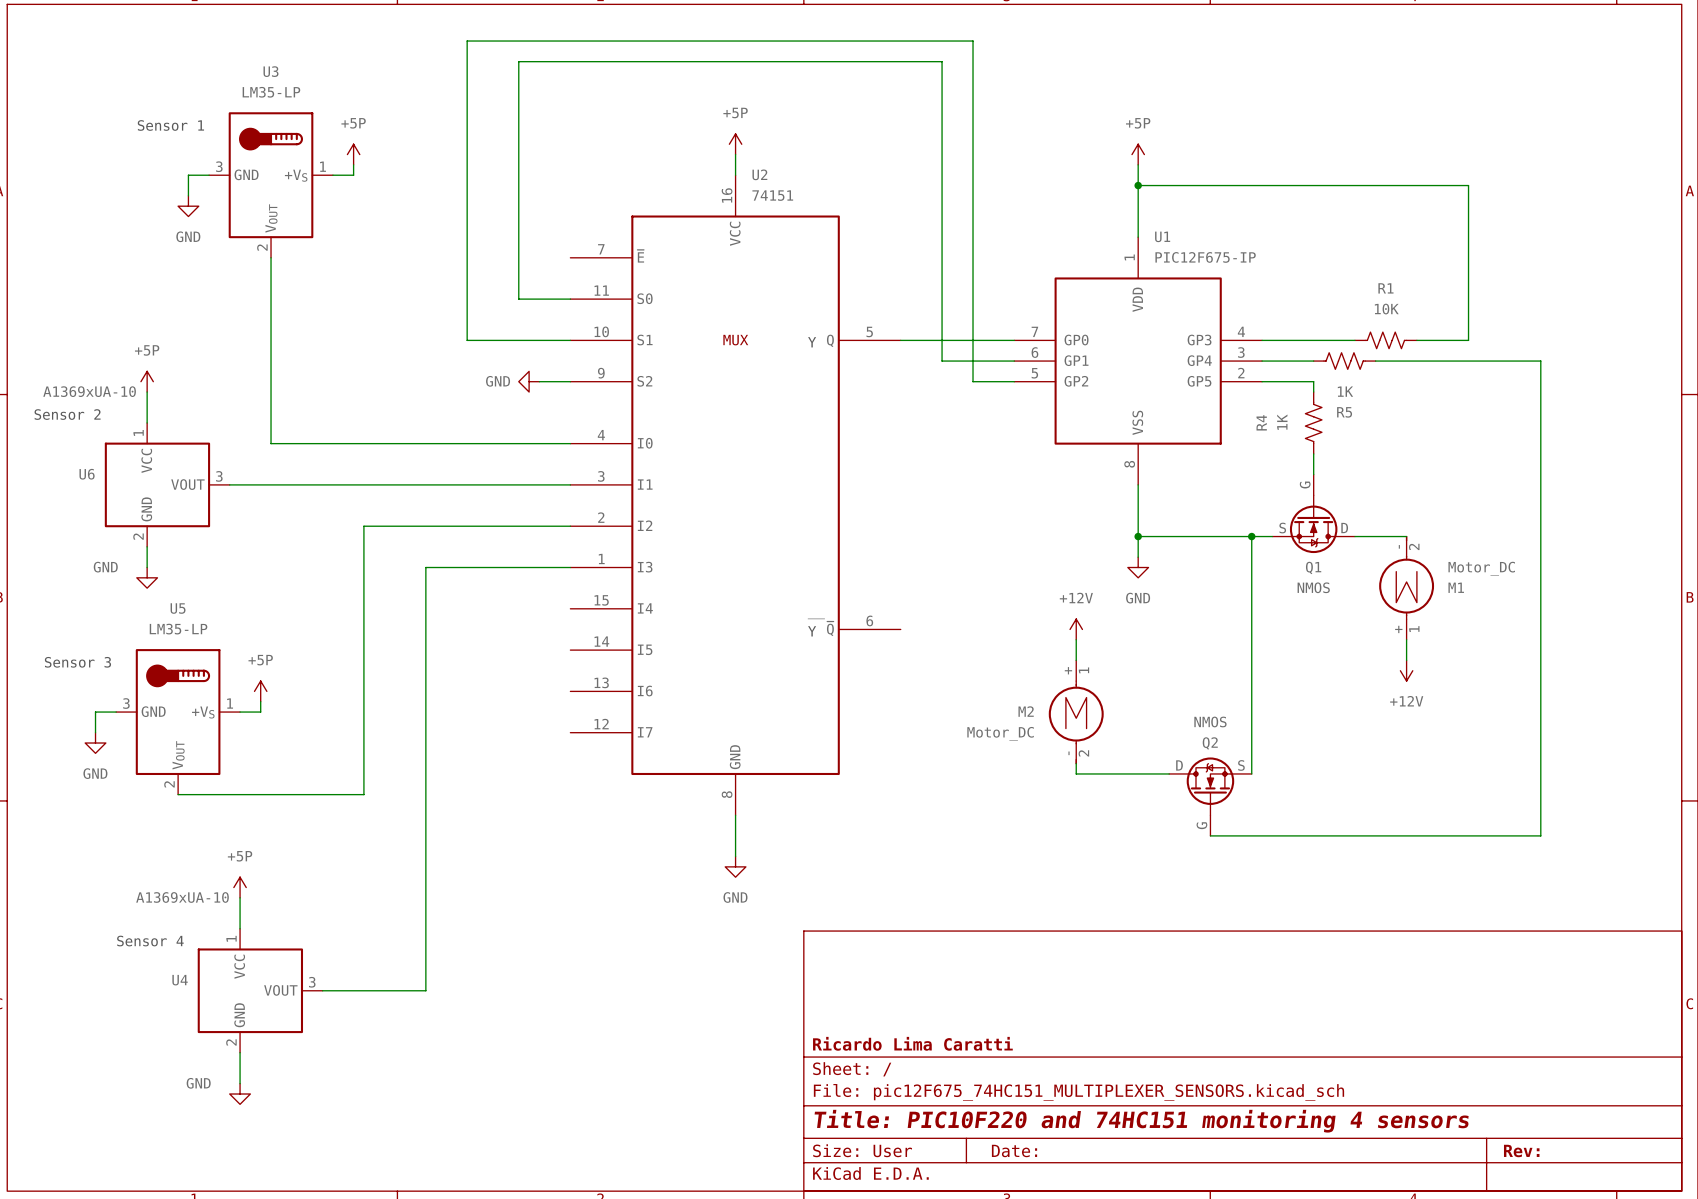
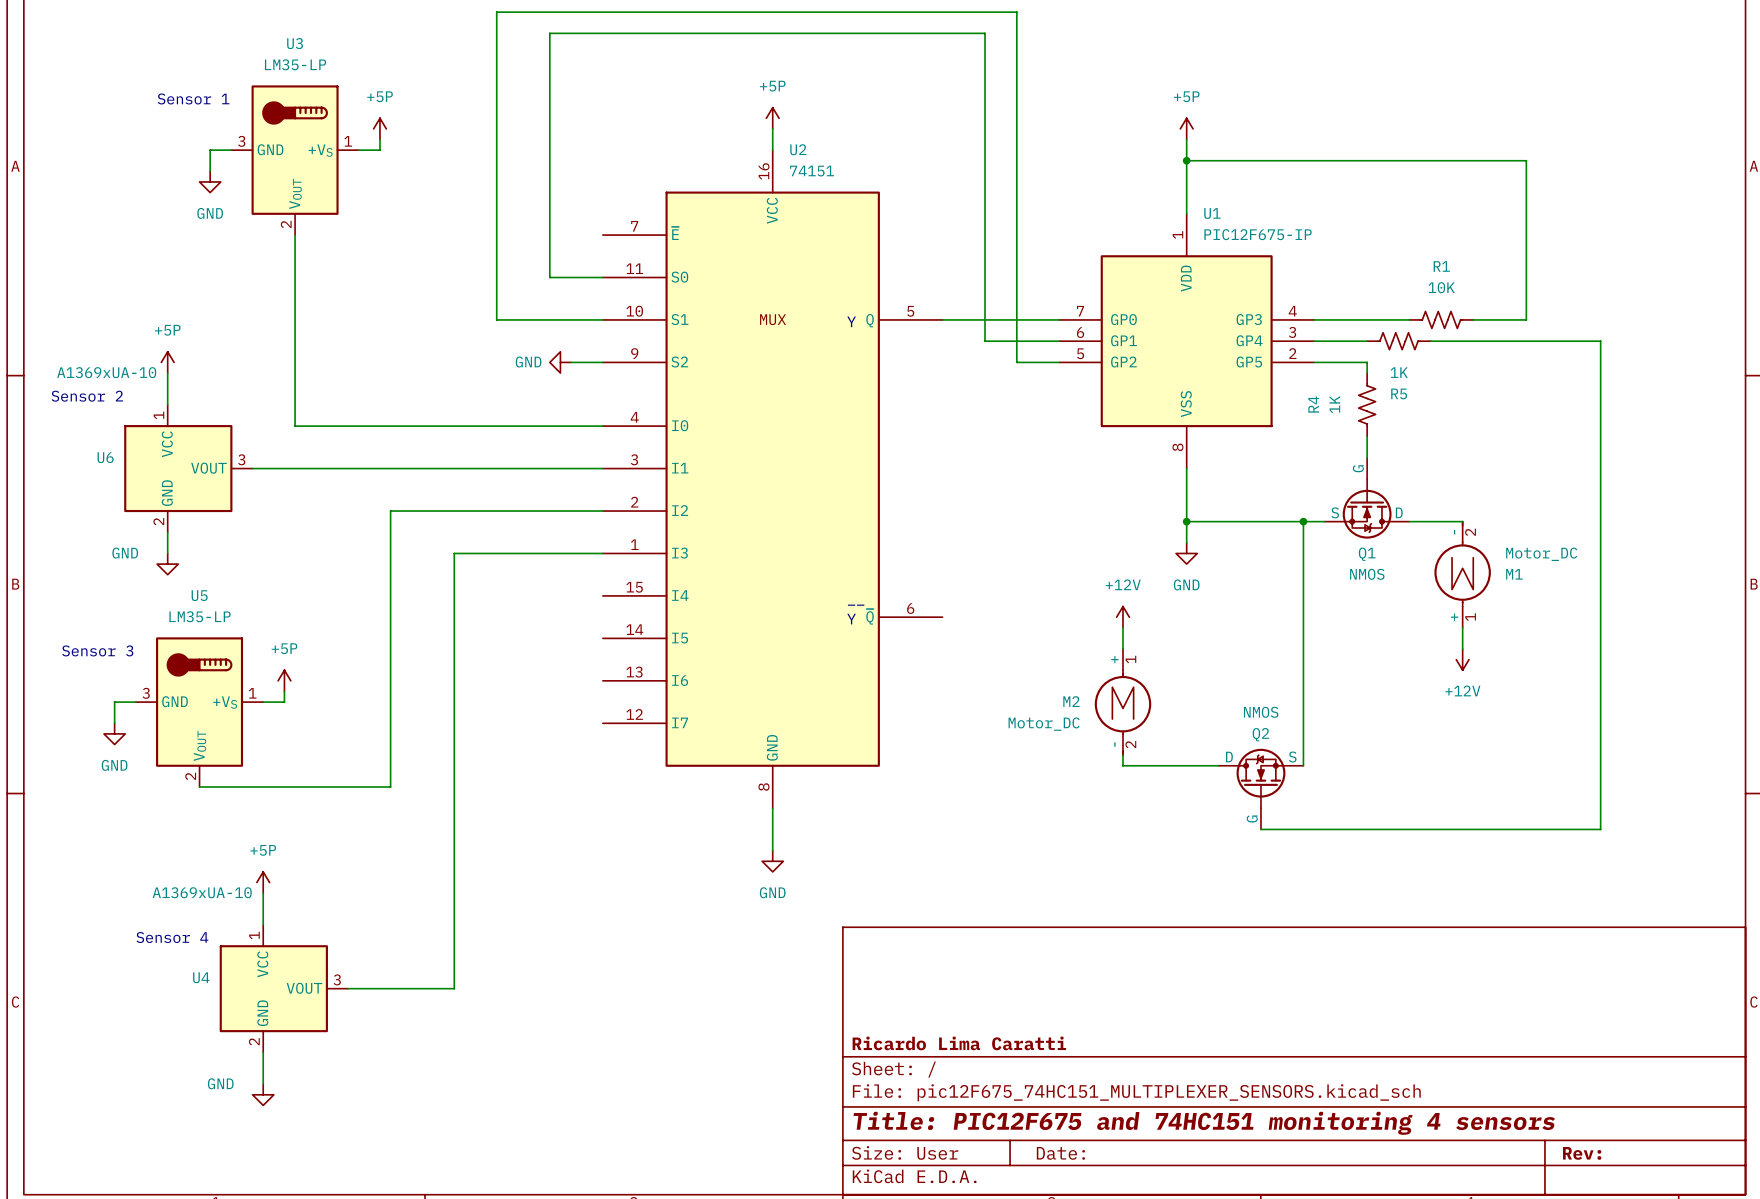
title block: Title: PIC10F220 and 74HC151 monitoring 4 sensors (1141, 1121) -> Title: PIC12F675 and 74HC151 monitoring 4 sensors (1204, 1123)

